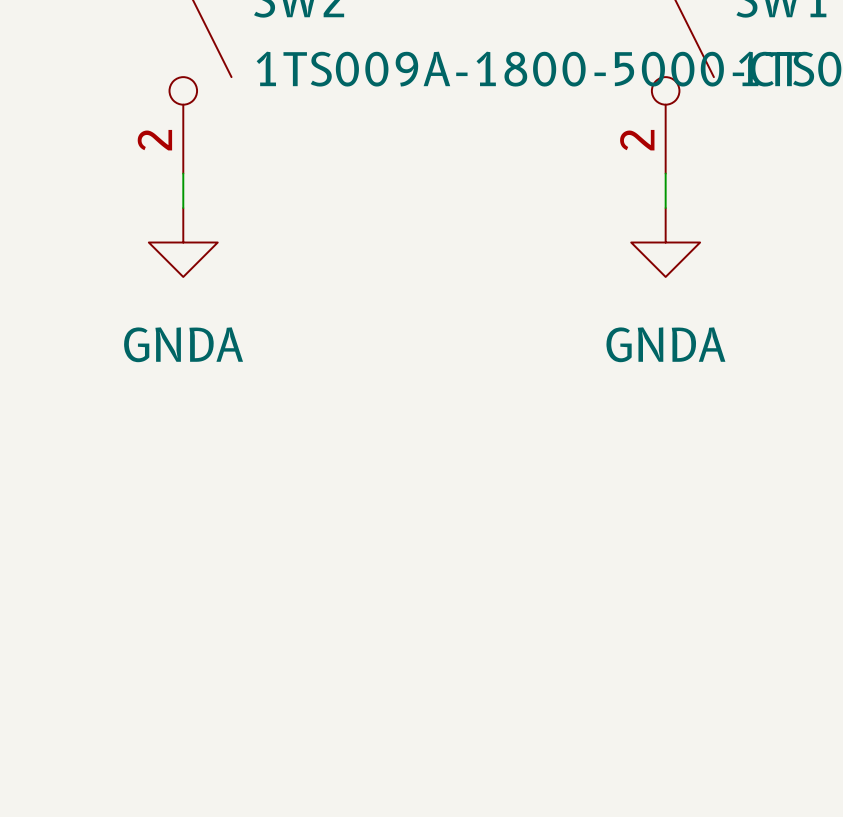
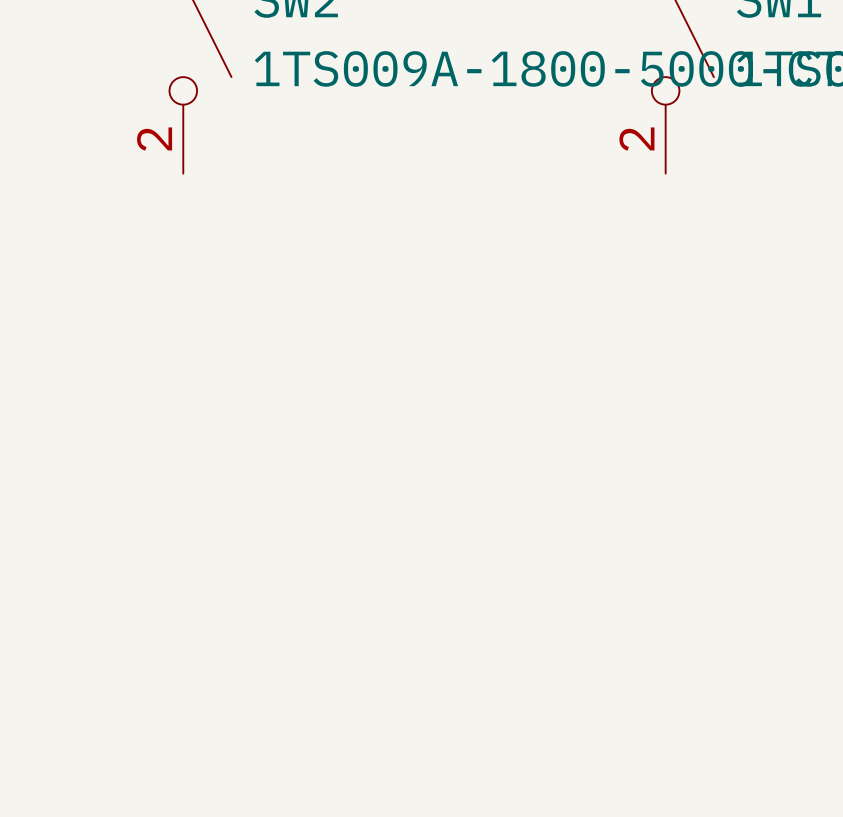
wire: (183, 173) (183, 208) -> none
wire: (665, 173) (665, 208) -> none
power symbol: GNDA (183, 242) -> none
power symbol: GNDA (665, 242) -> none

